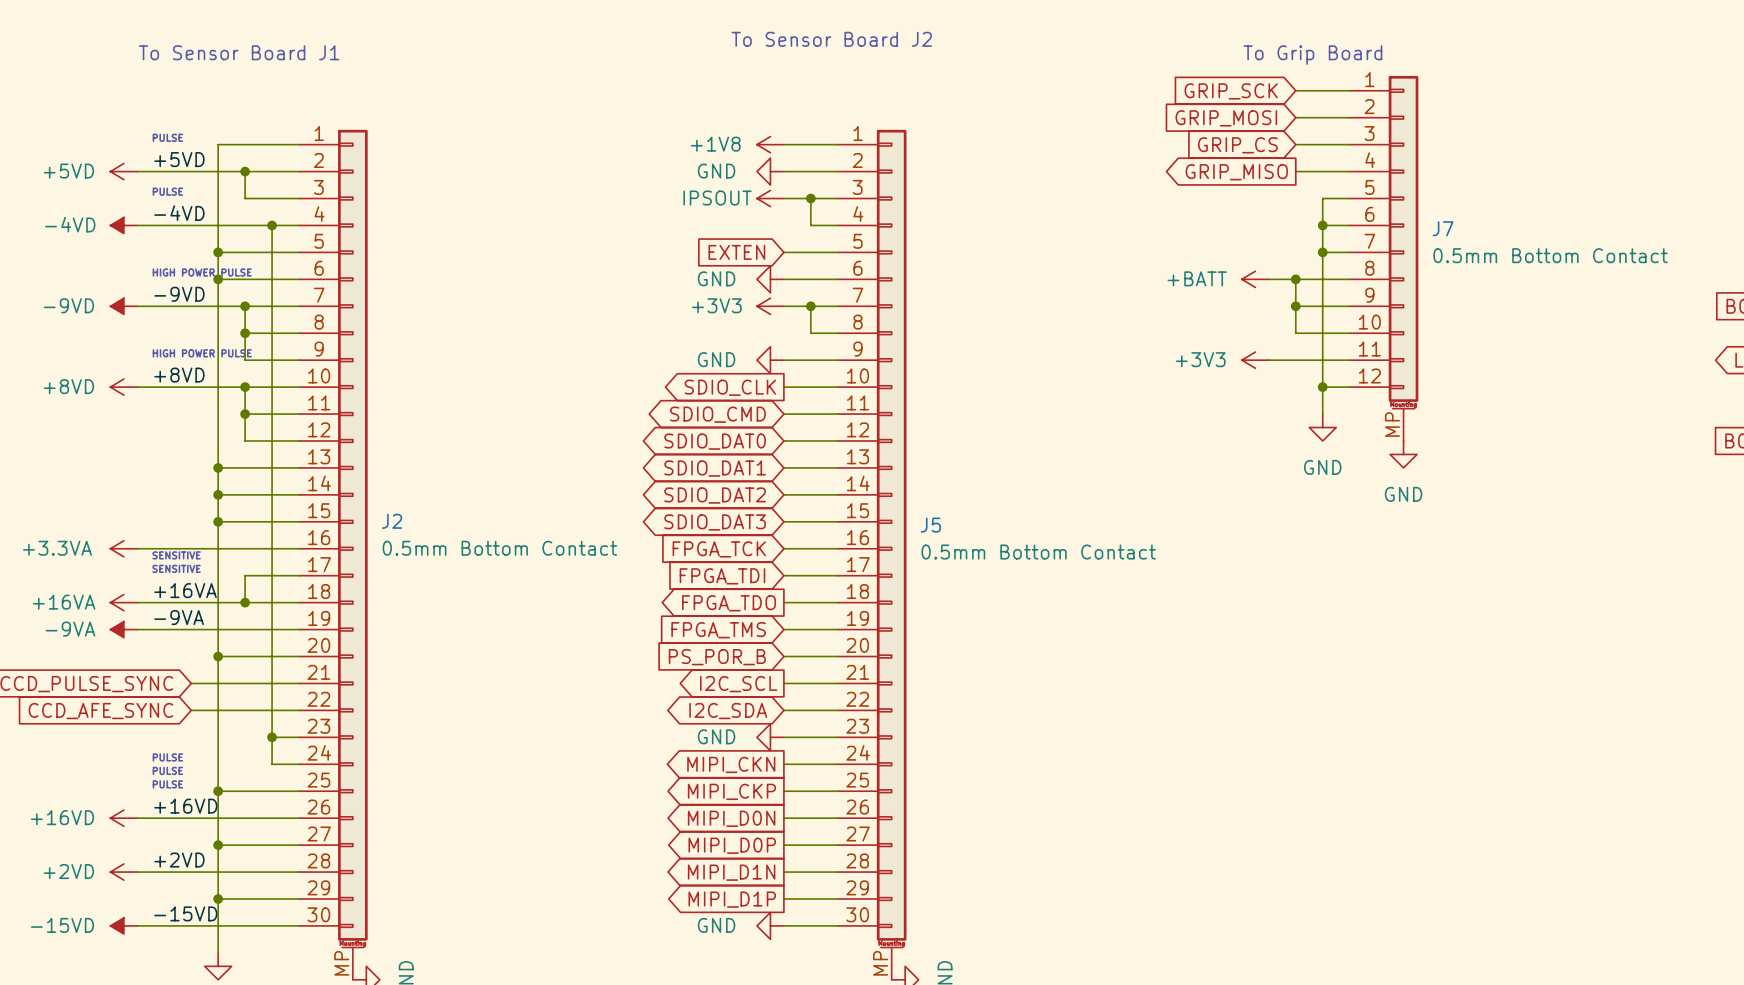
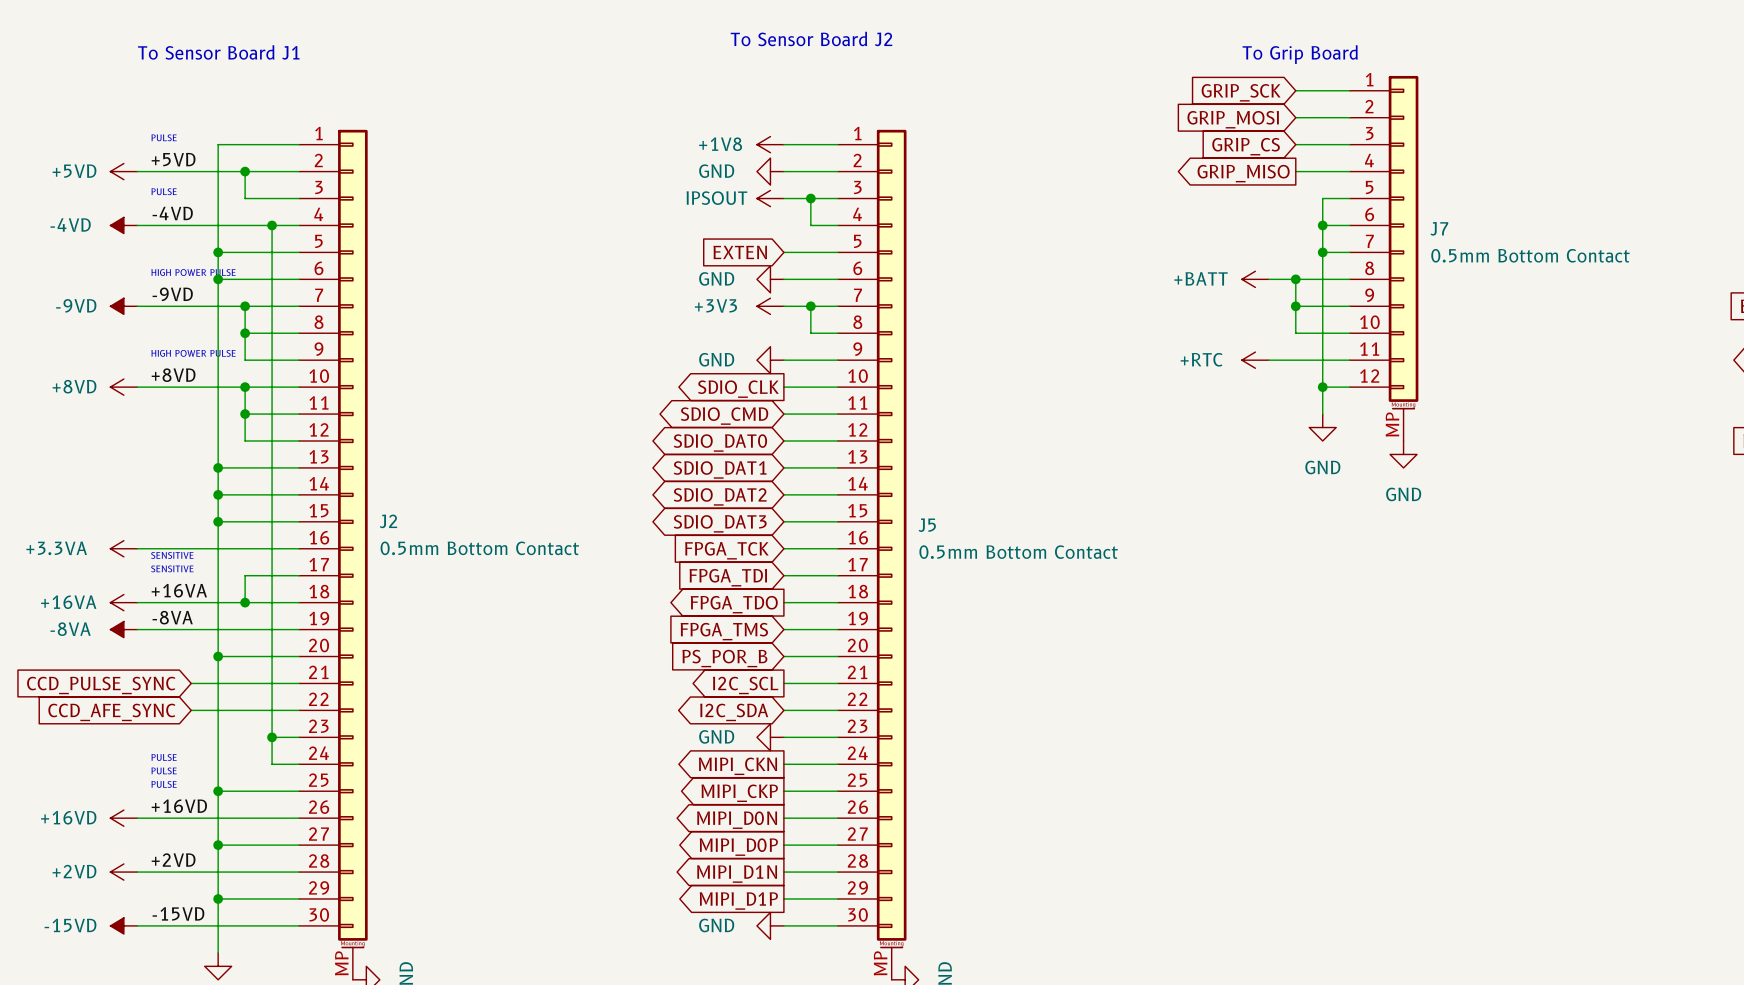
power symbol: +3V3 (1255, 360) -> +RTC (1255, 360)
label: -9VA (179, 617) -> -8VA (172, 617)
power symbol: -9VA (123, 629) -> -8VA (123, 629)

